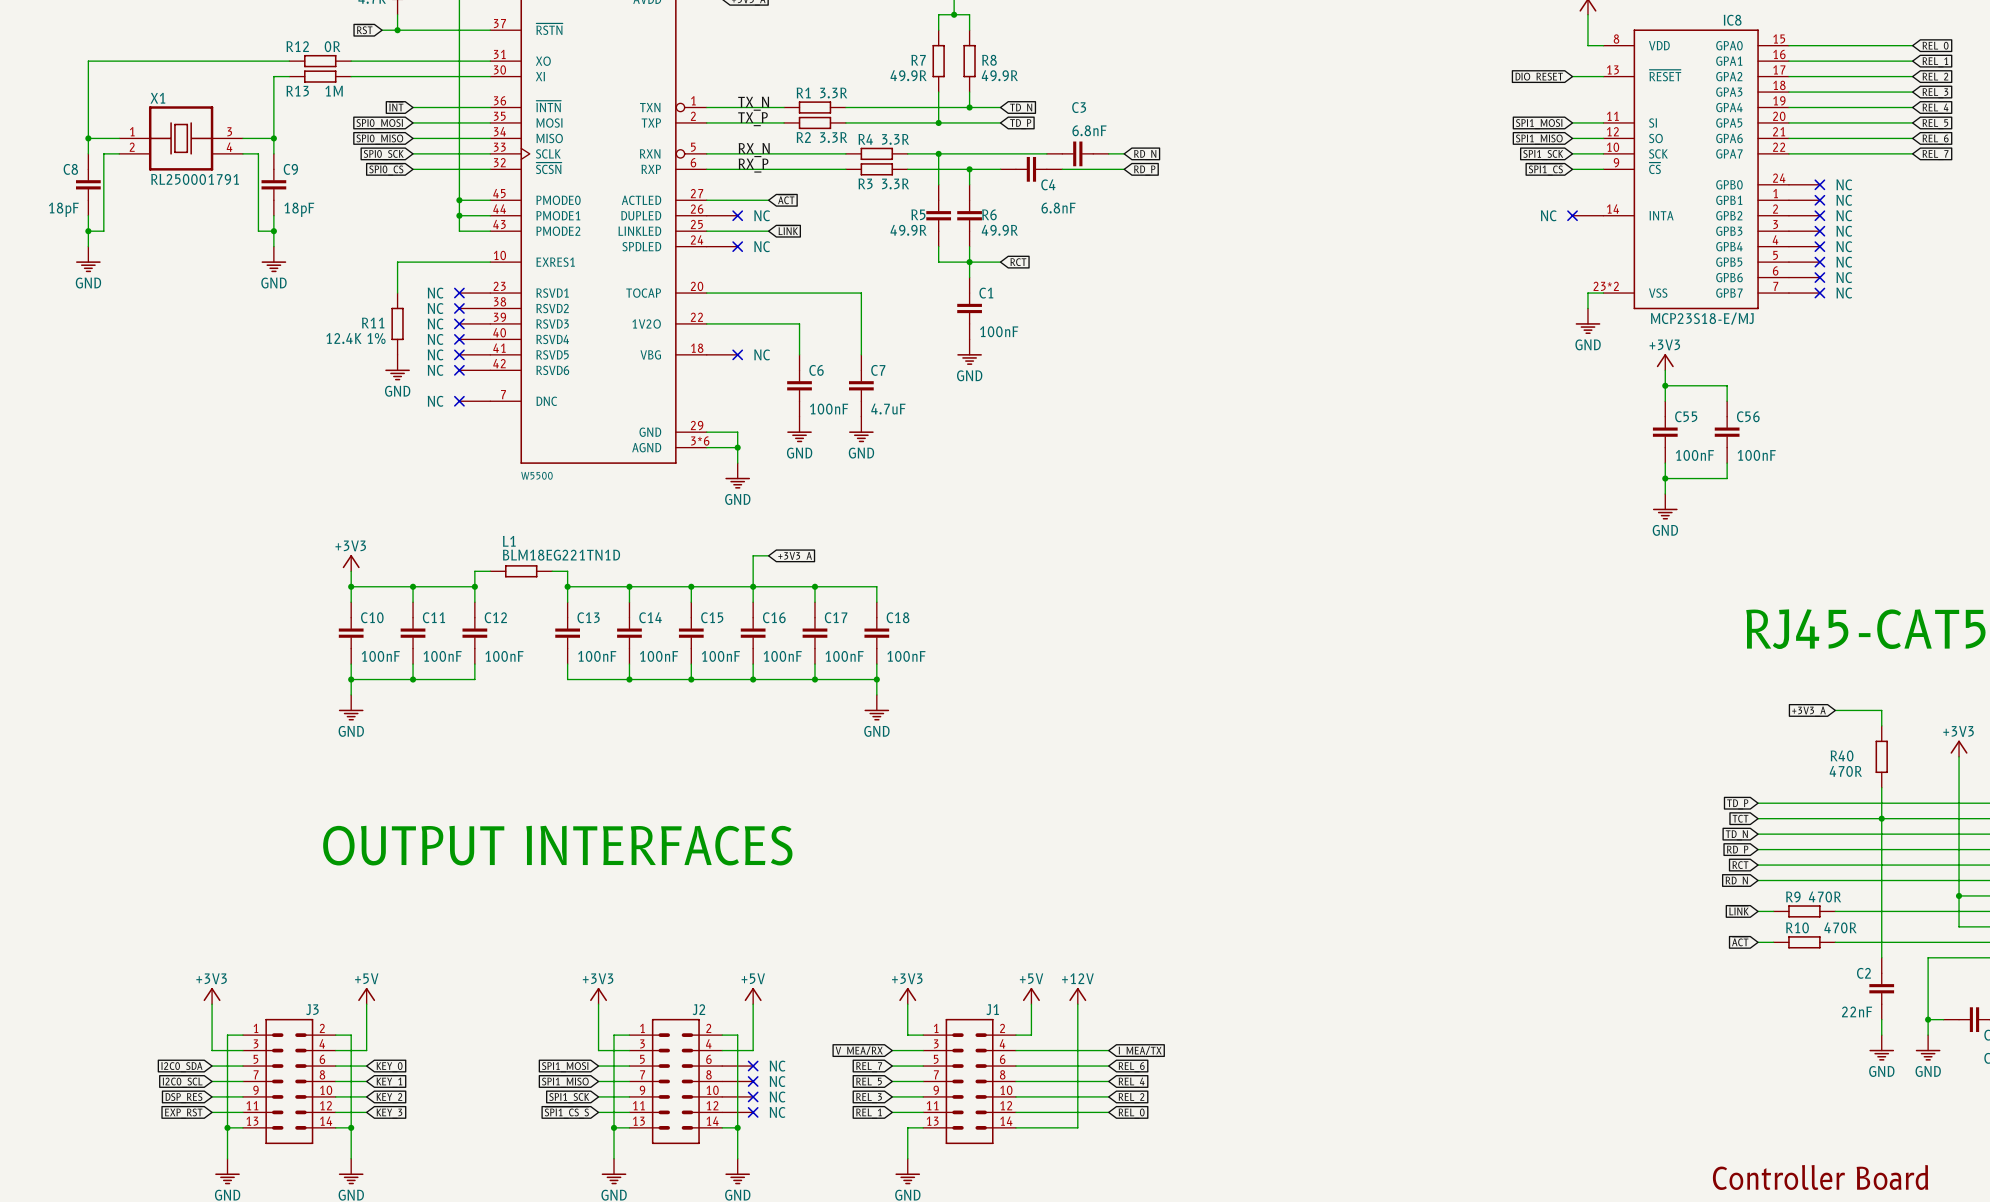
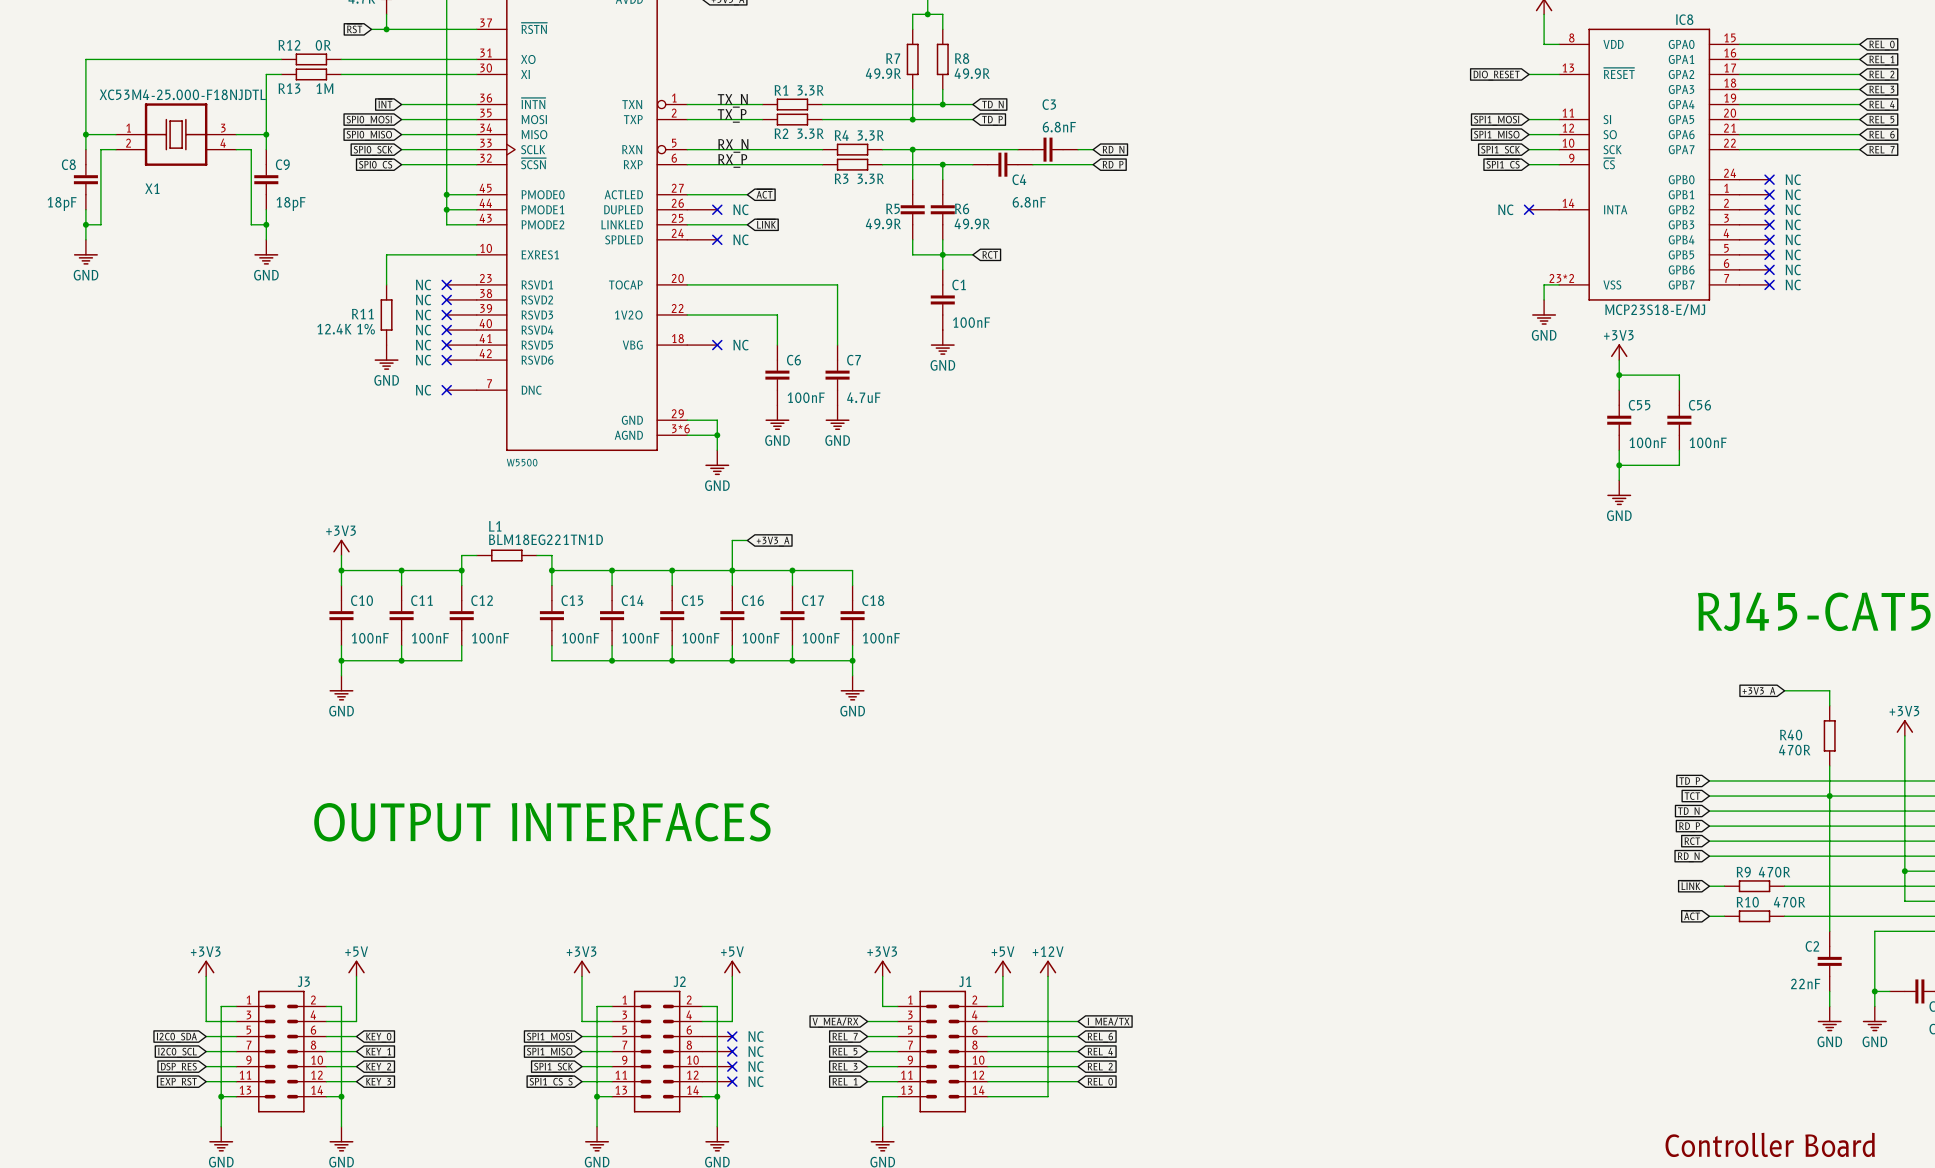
X1 name position: X1 (157, 98) -> X1 (152, 188)
X1 value: RL250001791 (195, 179) -> XC53M4-25.000-F18NJDTL (182, 94)

